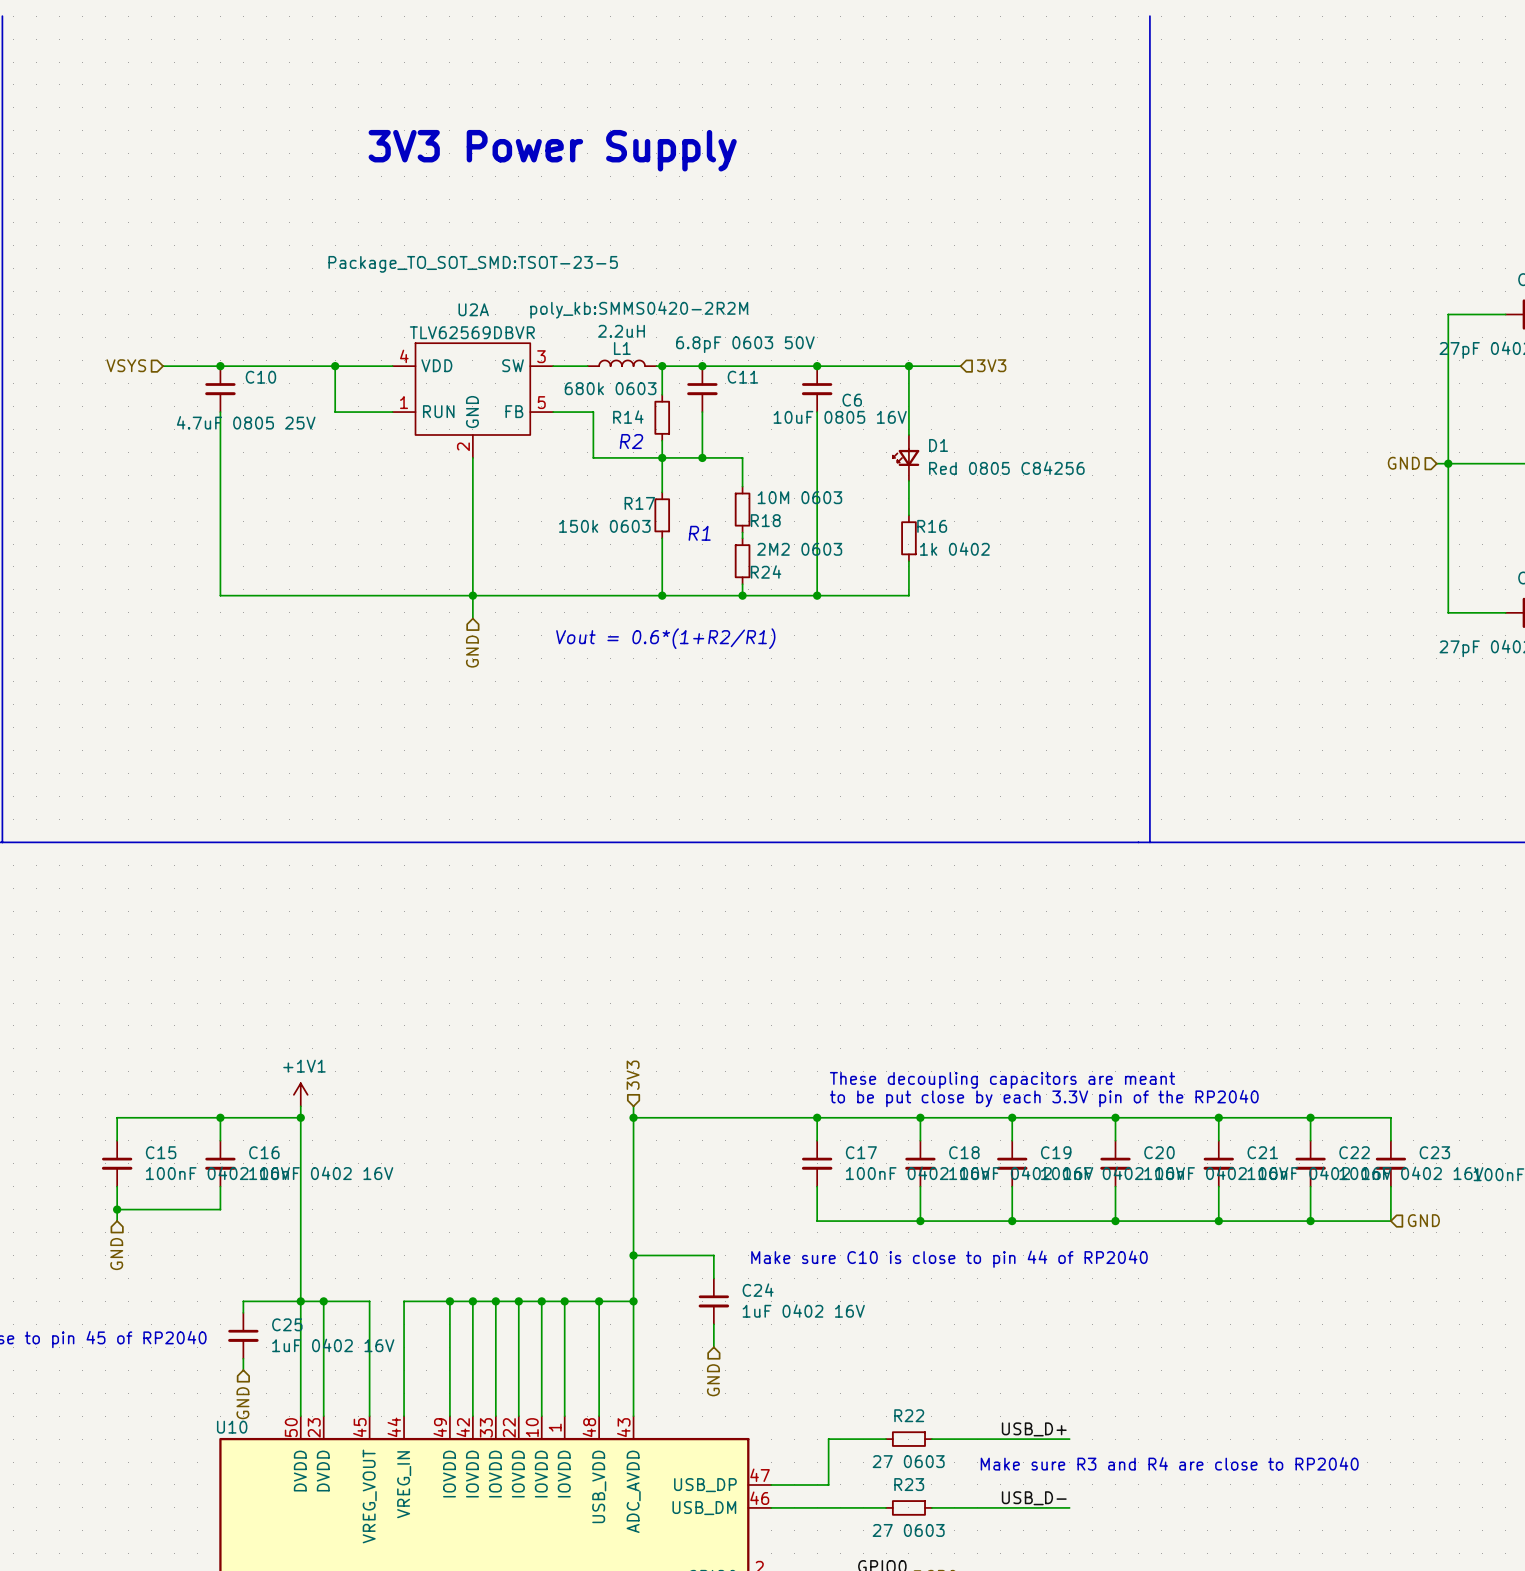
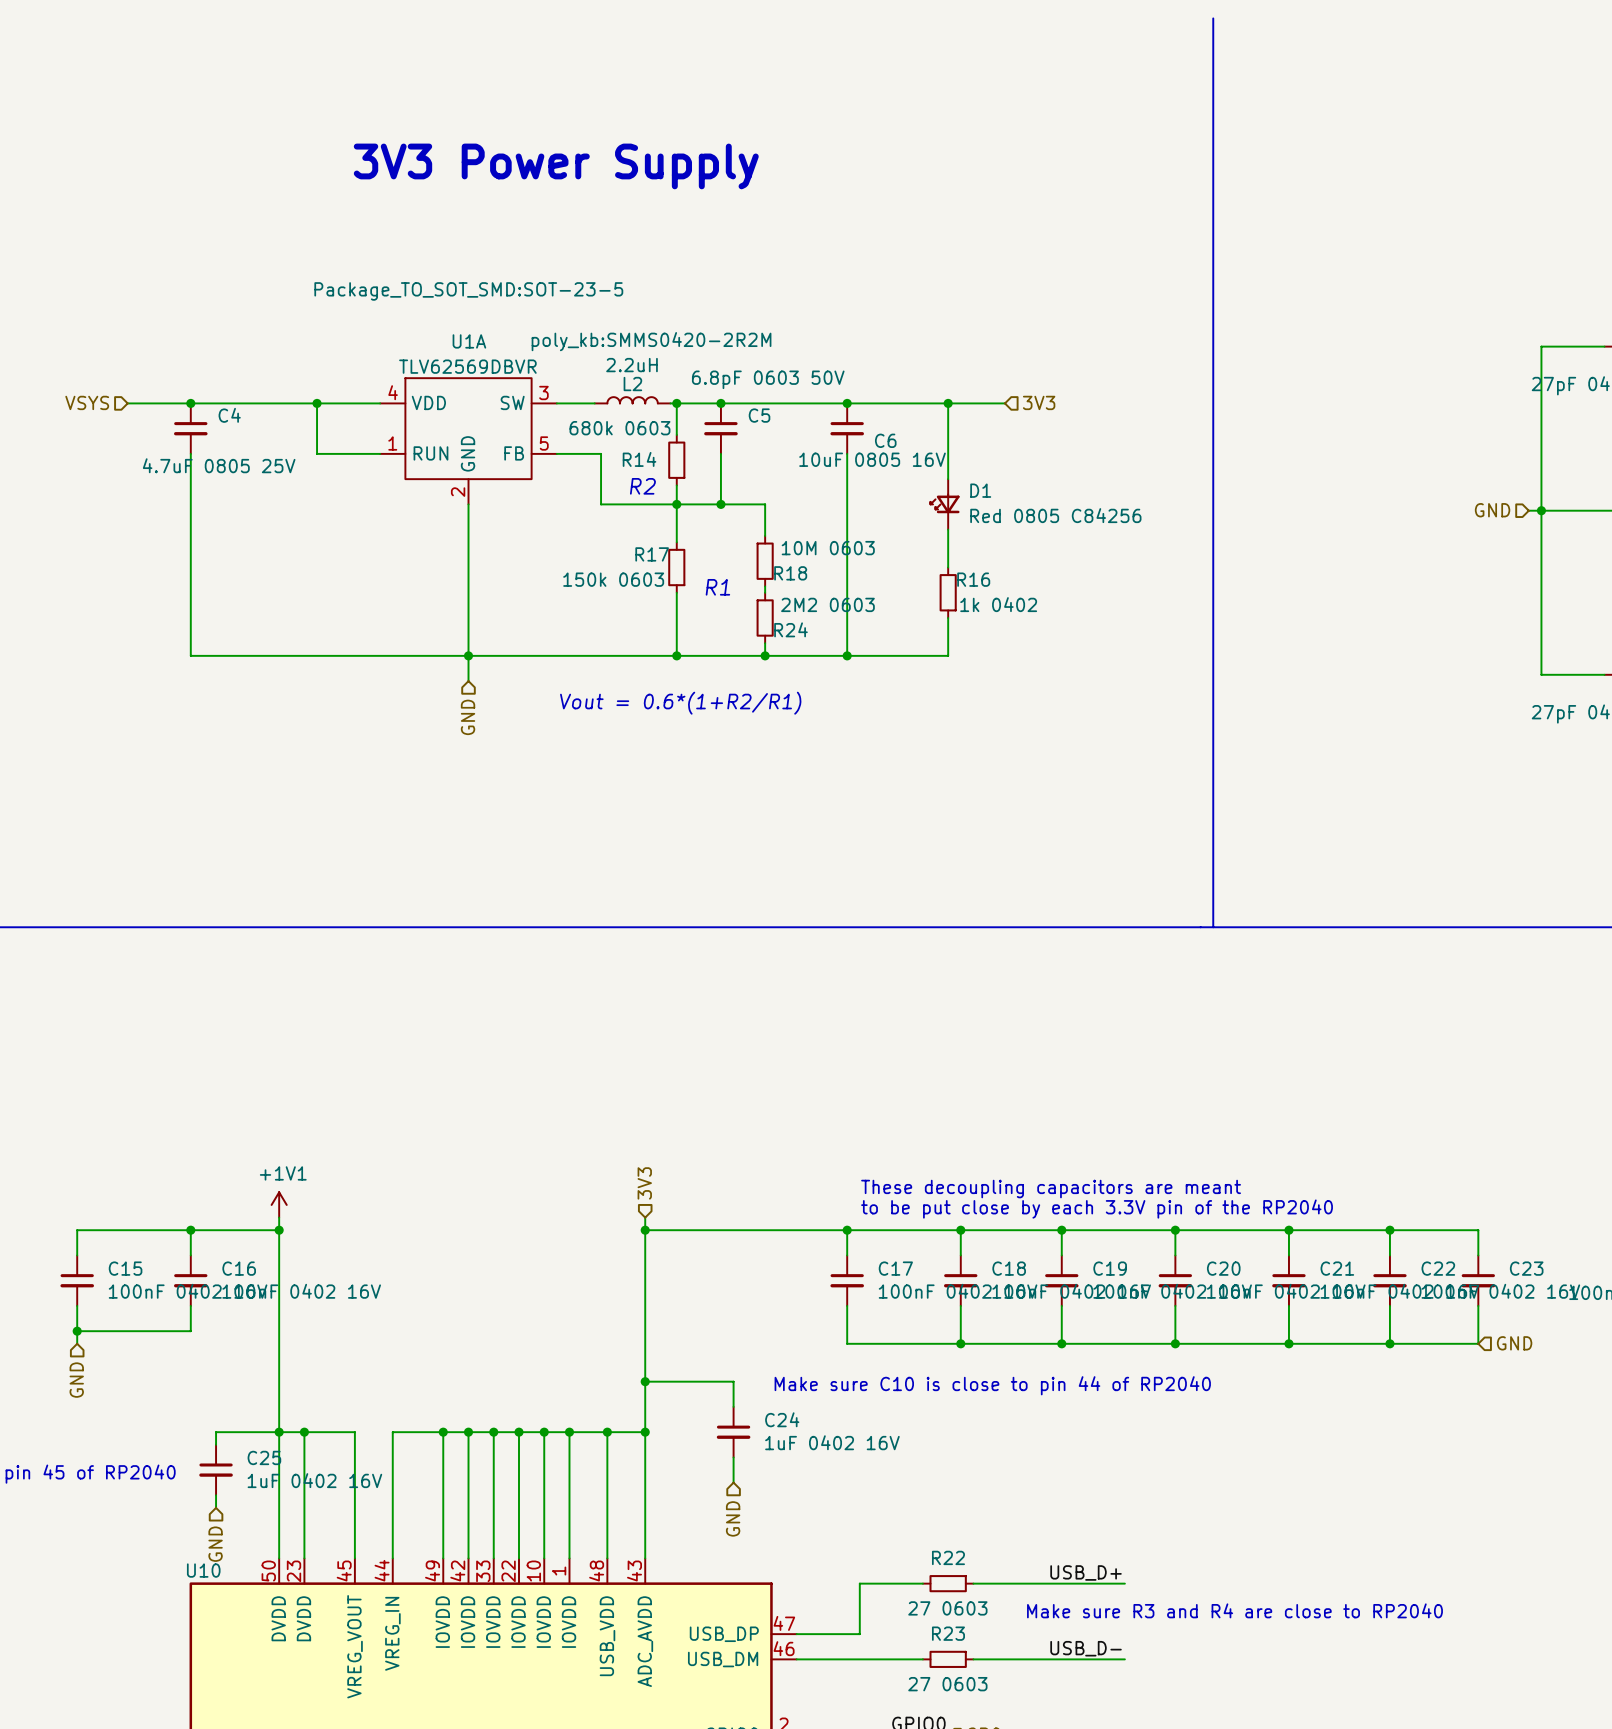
U2A text: Package_TO_SOT_SMD:TSOT-23-5 (473, 264) -> Package_TO_SOT_SMD:SOT-23-5 (468, 291)
U2A name: U2A (473, 309) -> U1A (469, 341)
L1 name: L1 (622, 348) -> L2 (632, 384)
C10 name: C10 (260, 377) -> C4 (229, 415)
C11 name: C11 (742, 377) -> C5 (759, 415)

